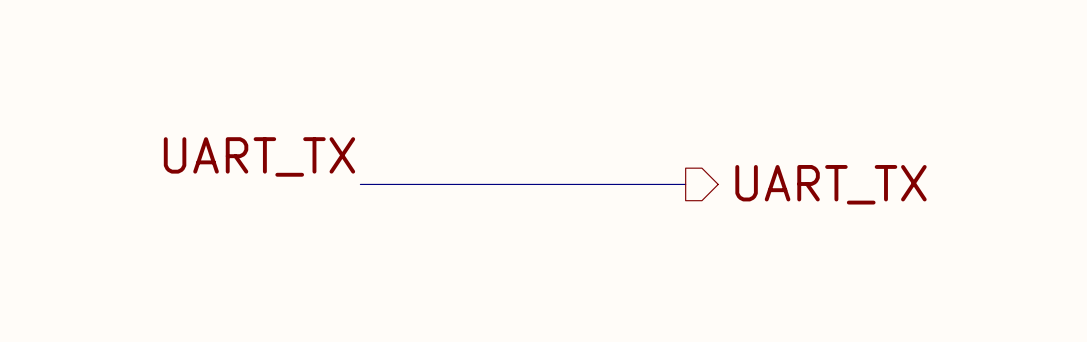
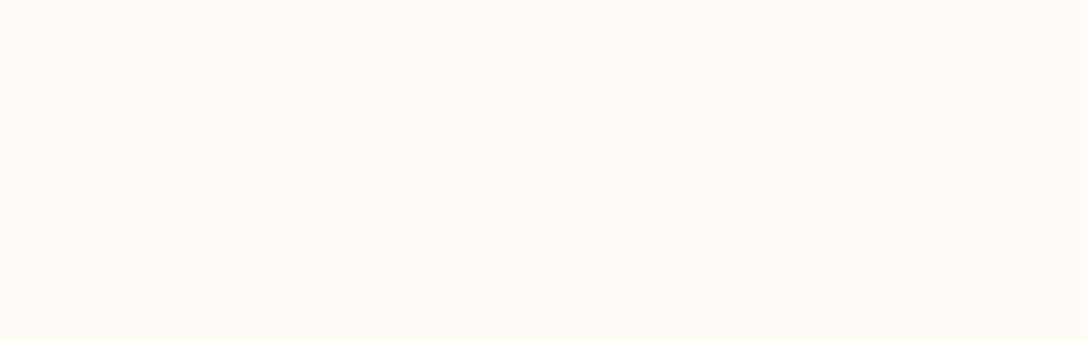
label: UART_TX (259, 156) -> none
wire: (360, 184) (685, 184) -> none
hierarchical label: UART_TX (831, 184) -> none

